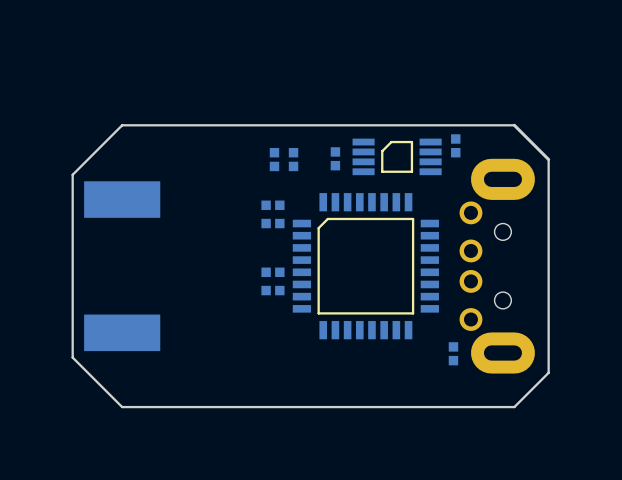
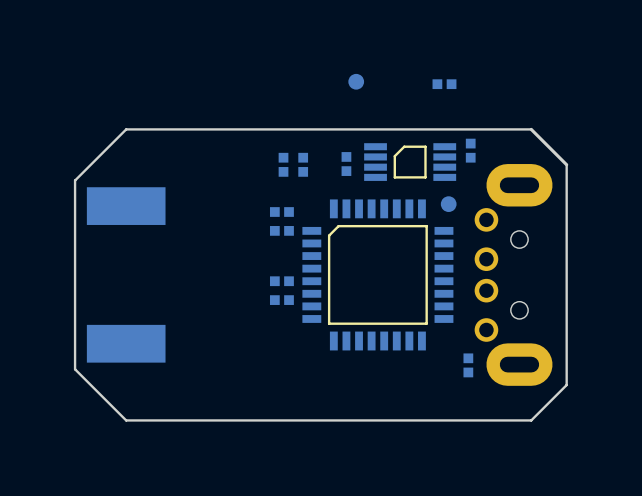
part: none -> (356, 81)
part: none -> (444, 84)
part: none -> (448, 204)

